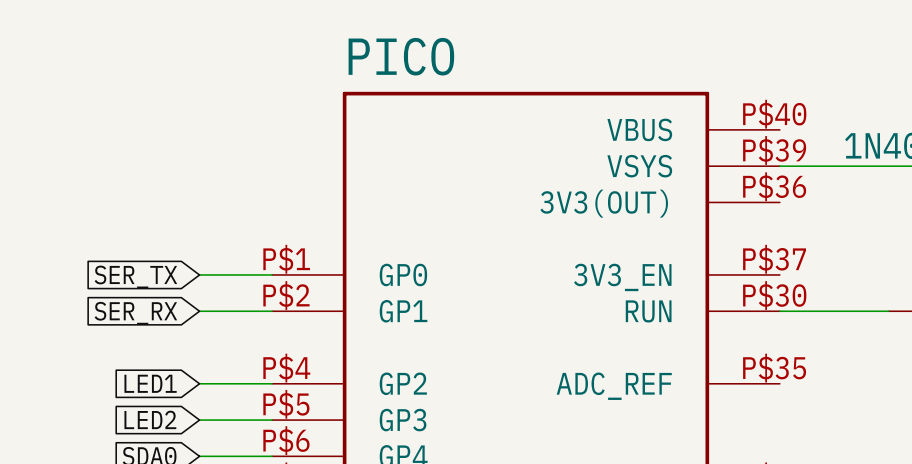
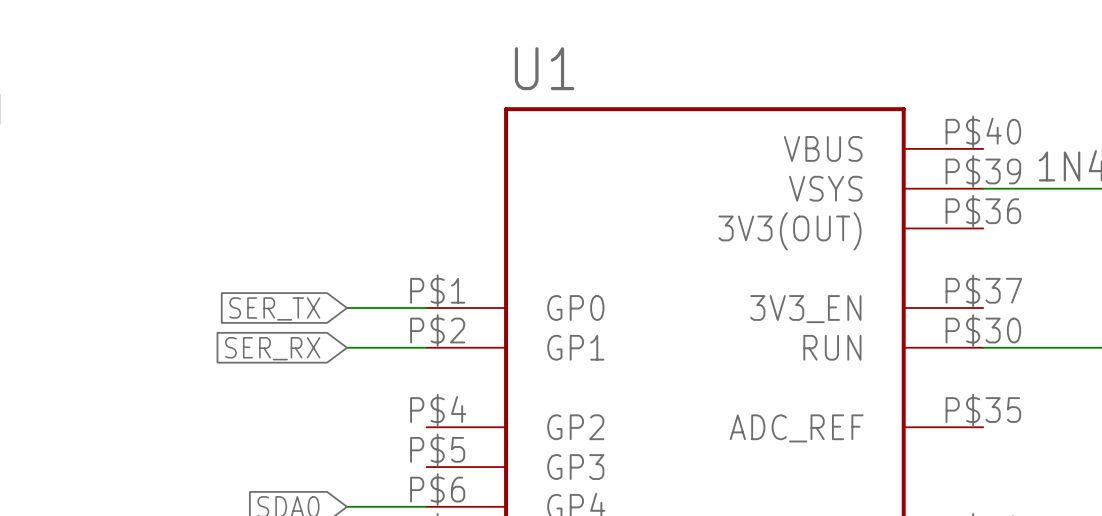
PICO name: PICO (401, 56) -> U1 (544, 68)
global label: LED1 (150, 383) -> none
wire: (199, 383) (272, 383) -> none
global label: LED2 (150, 419) -> none
wire: (199, 420) (272, 420) -> none

